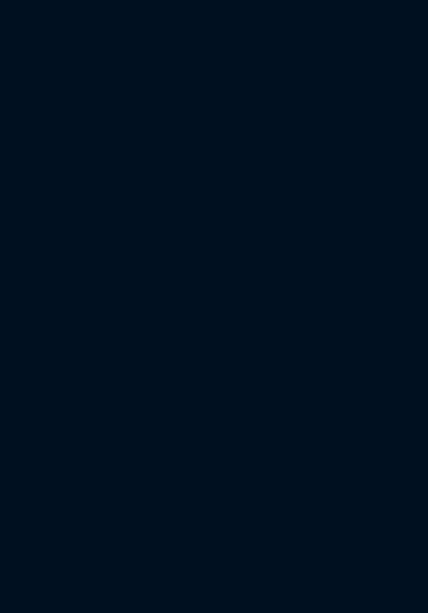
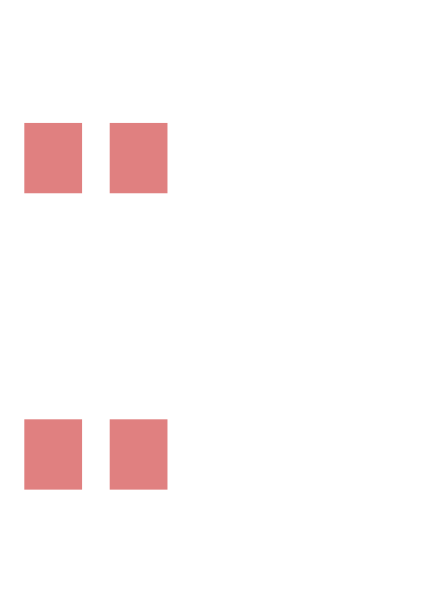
part: none -> (95, 158)
part: none -> (95, 454)

